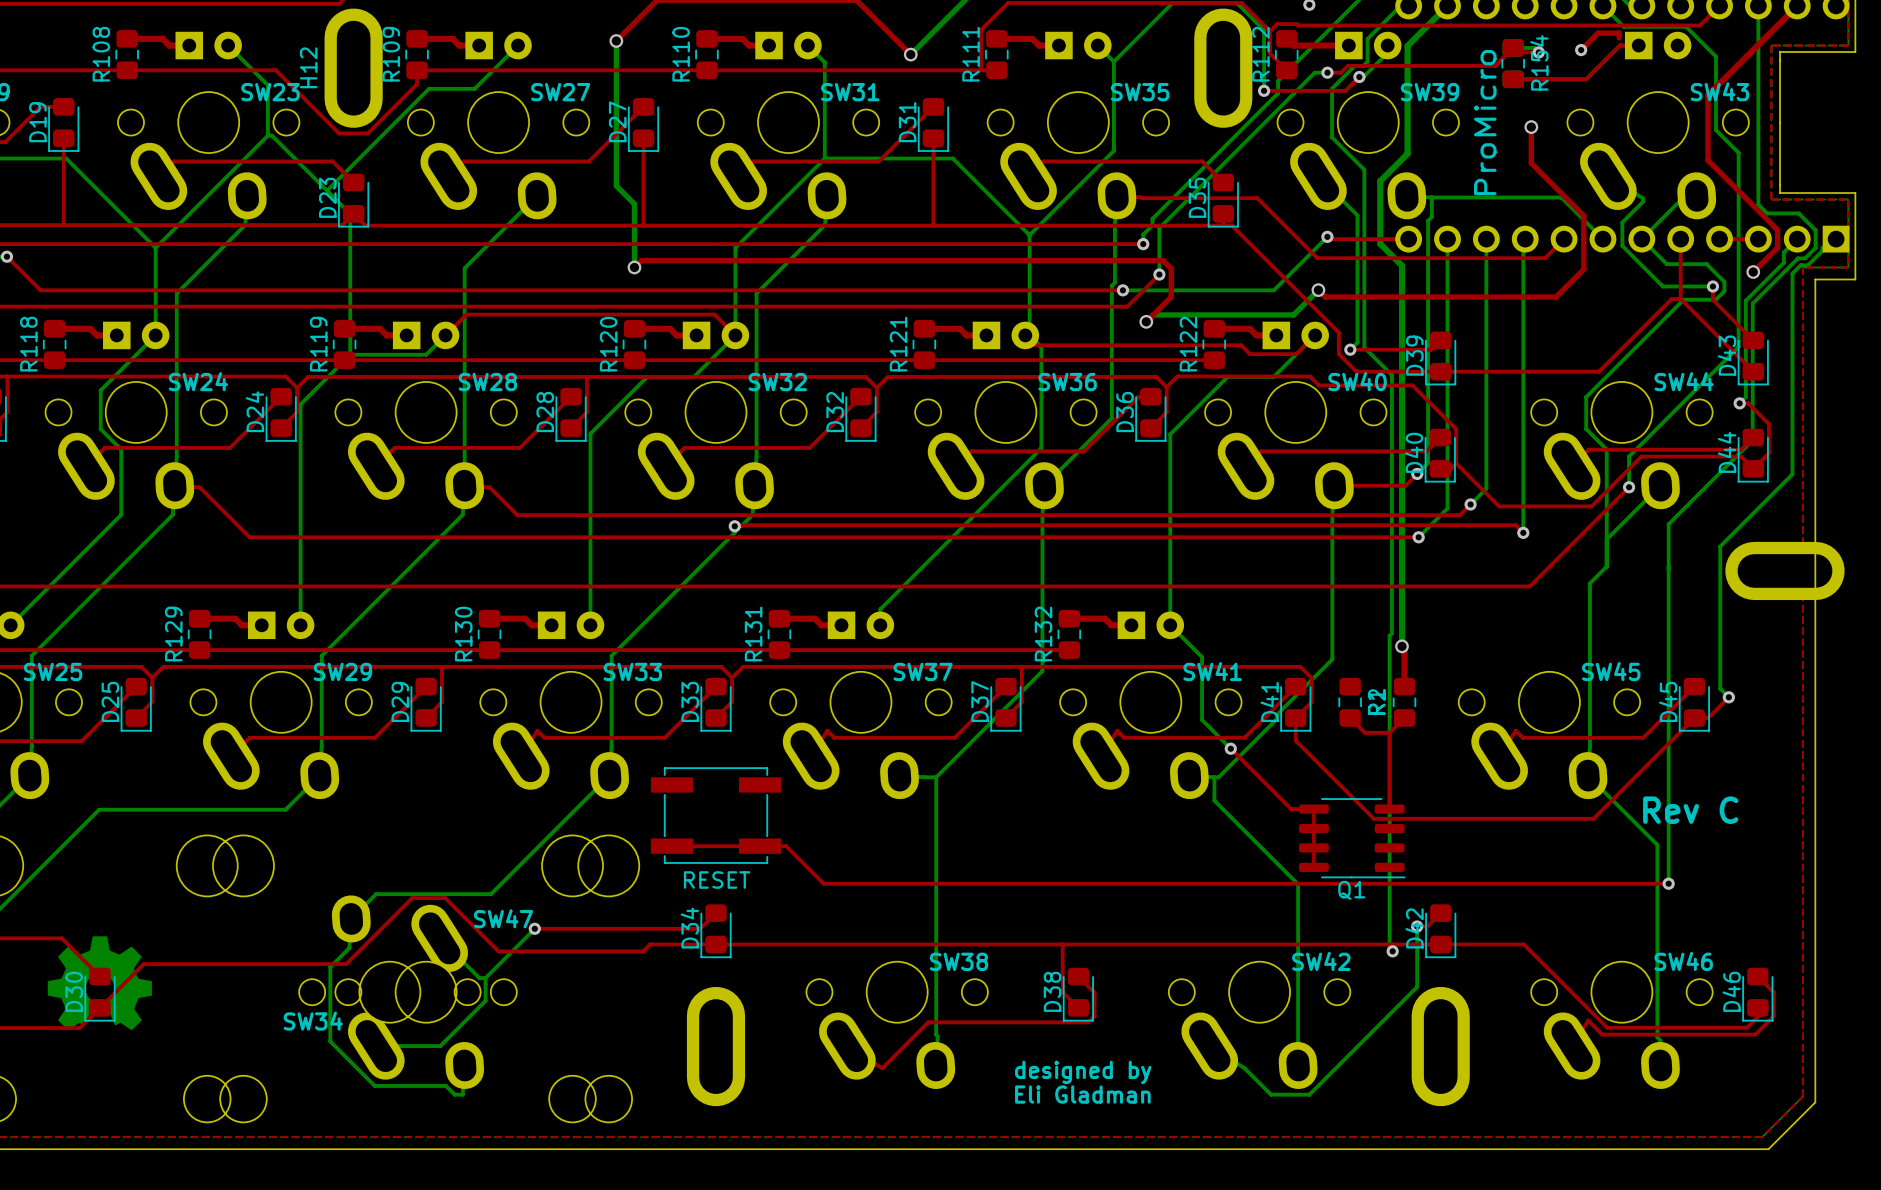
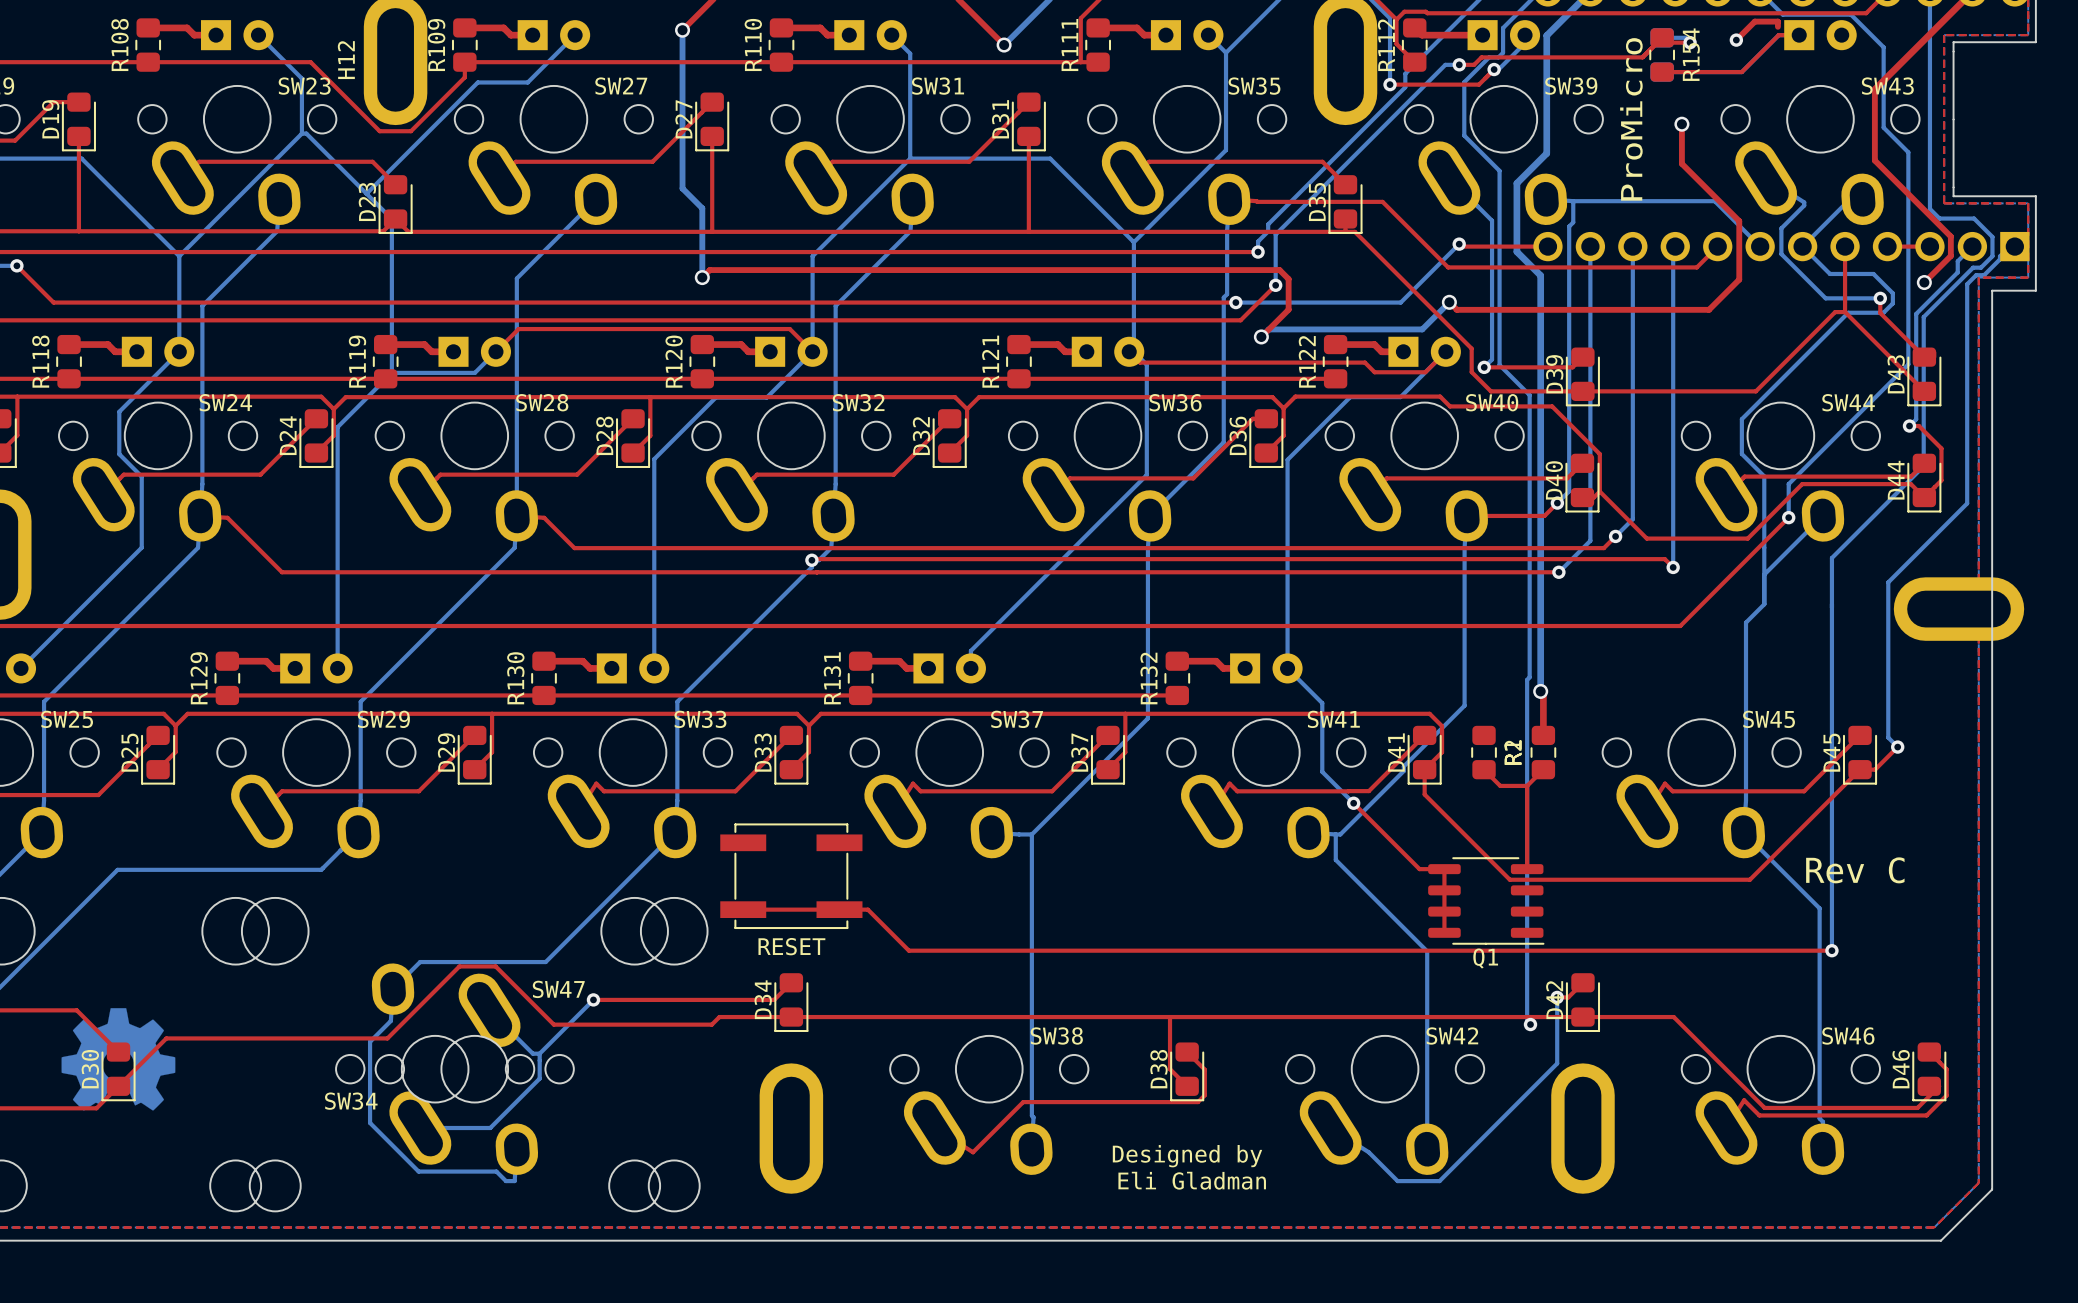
text: designed by (1083, 1072) -> Designed by (1187, 1156)

